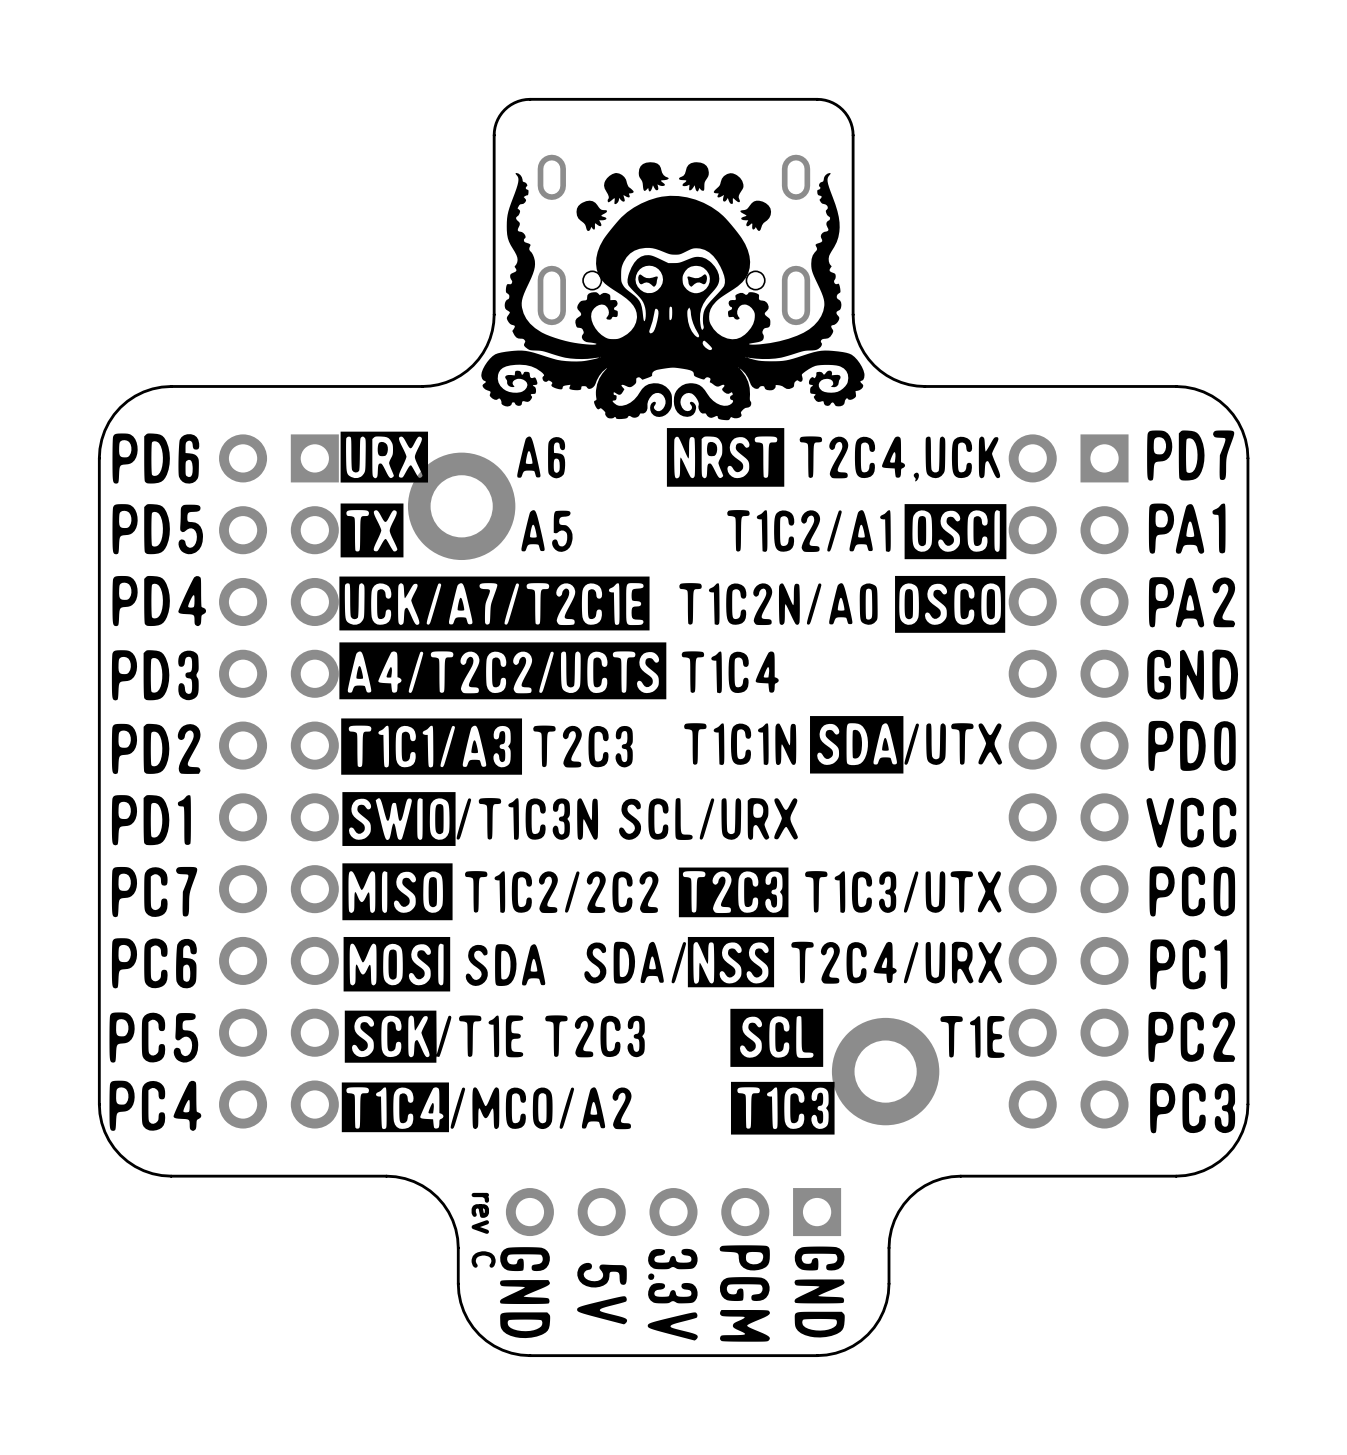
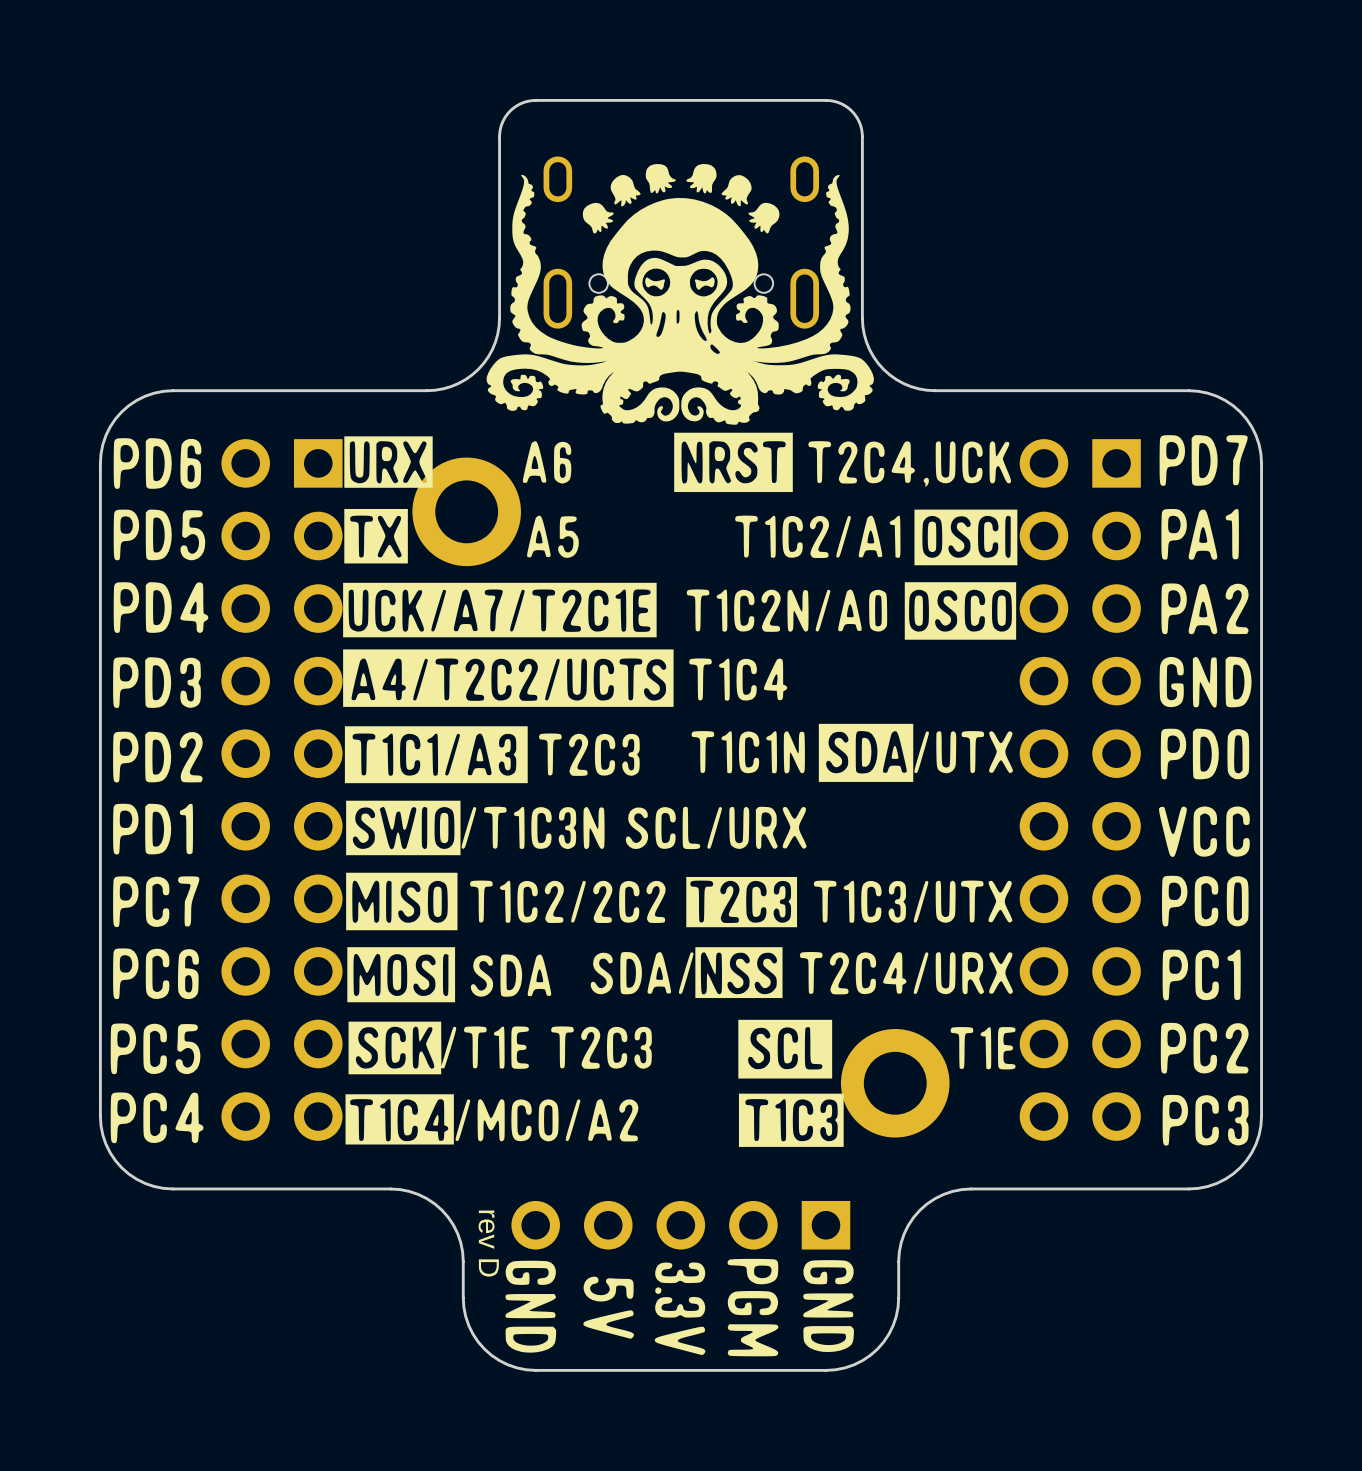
text: rev C (483, 1230) -> rev D (488, 1243)

